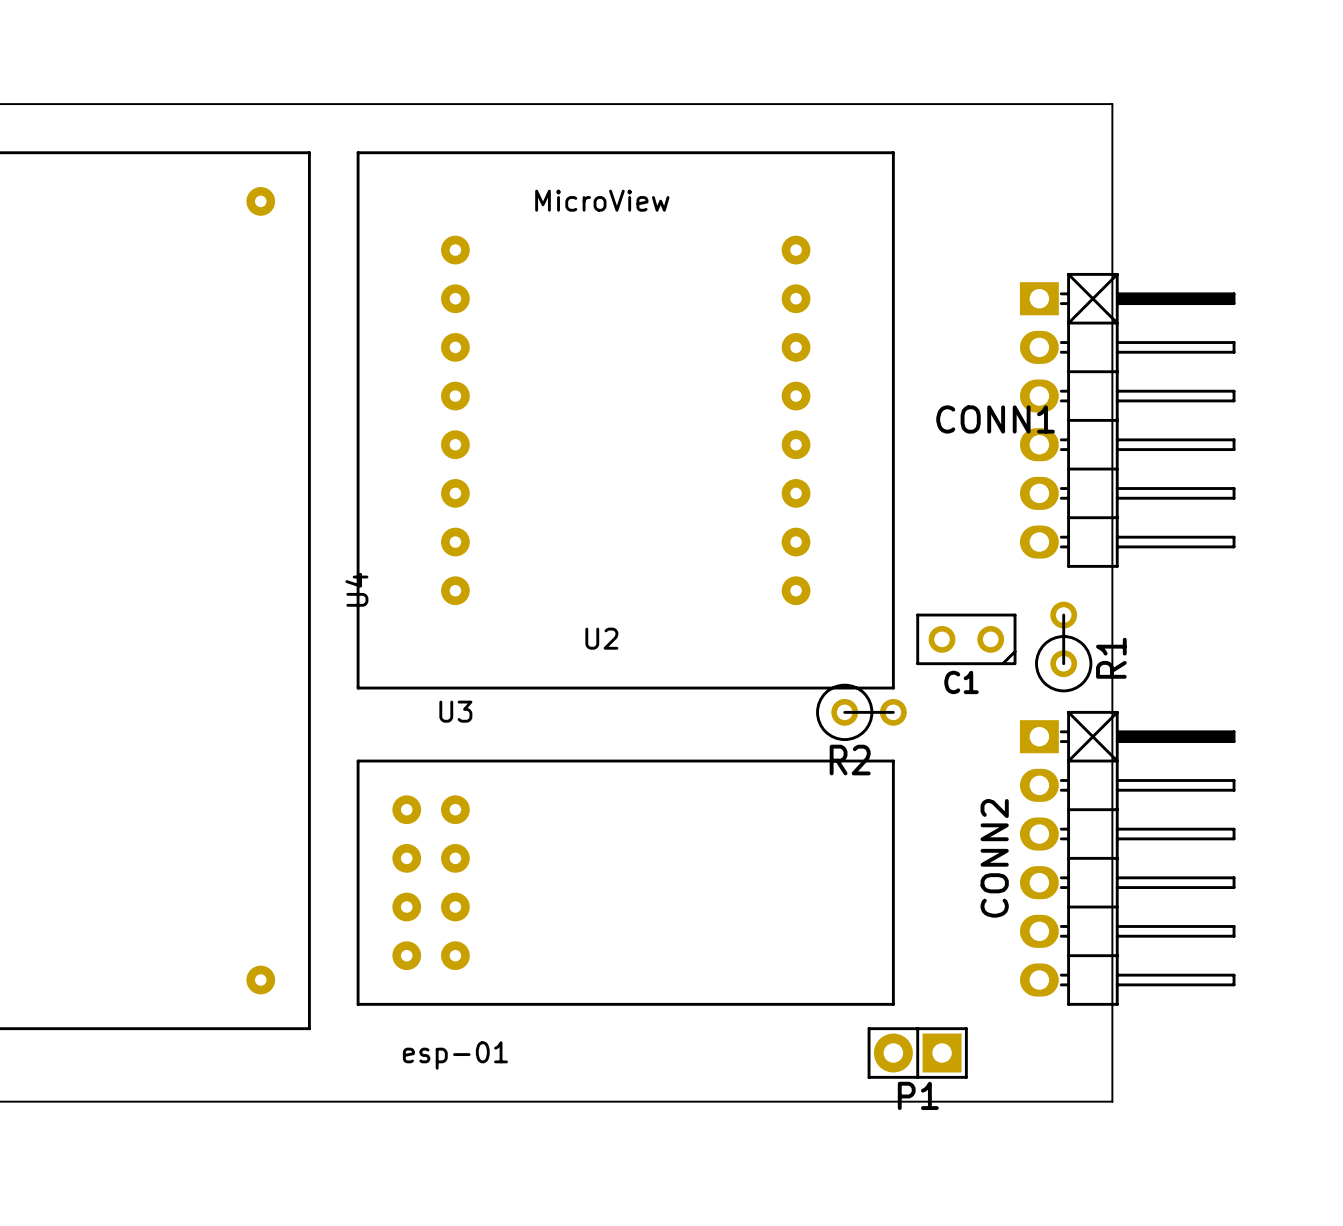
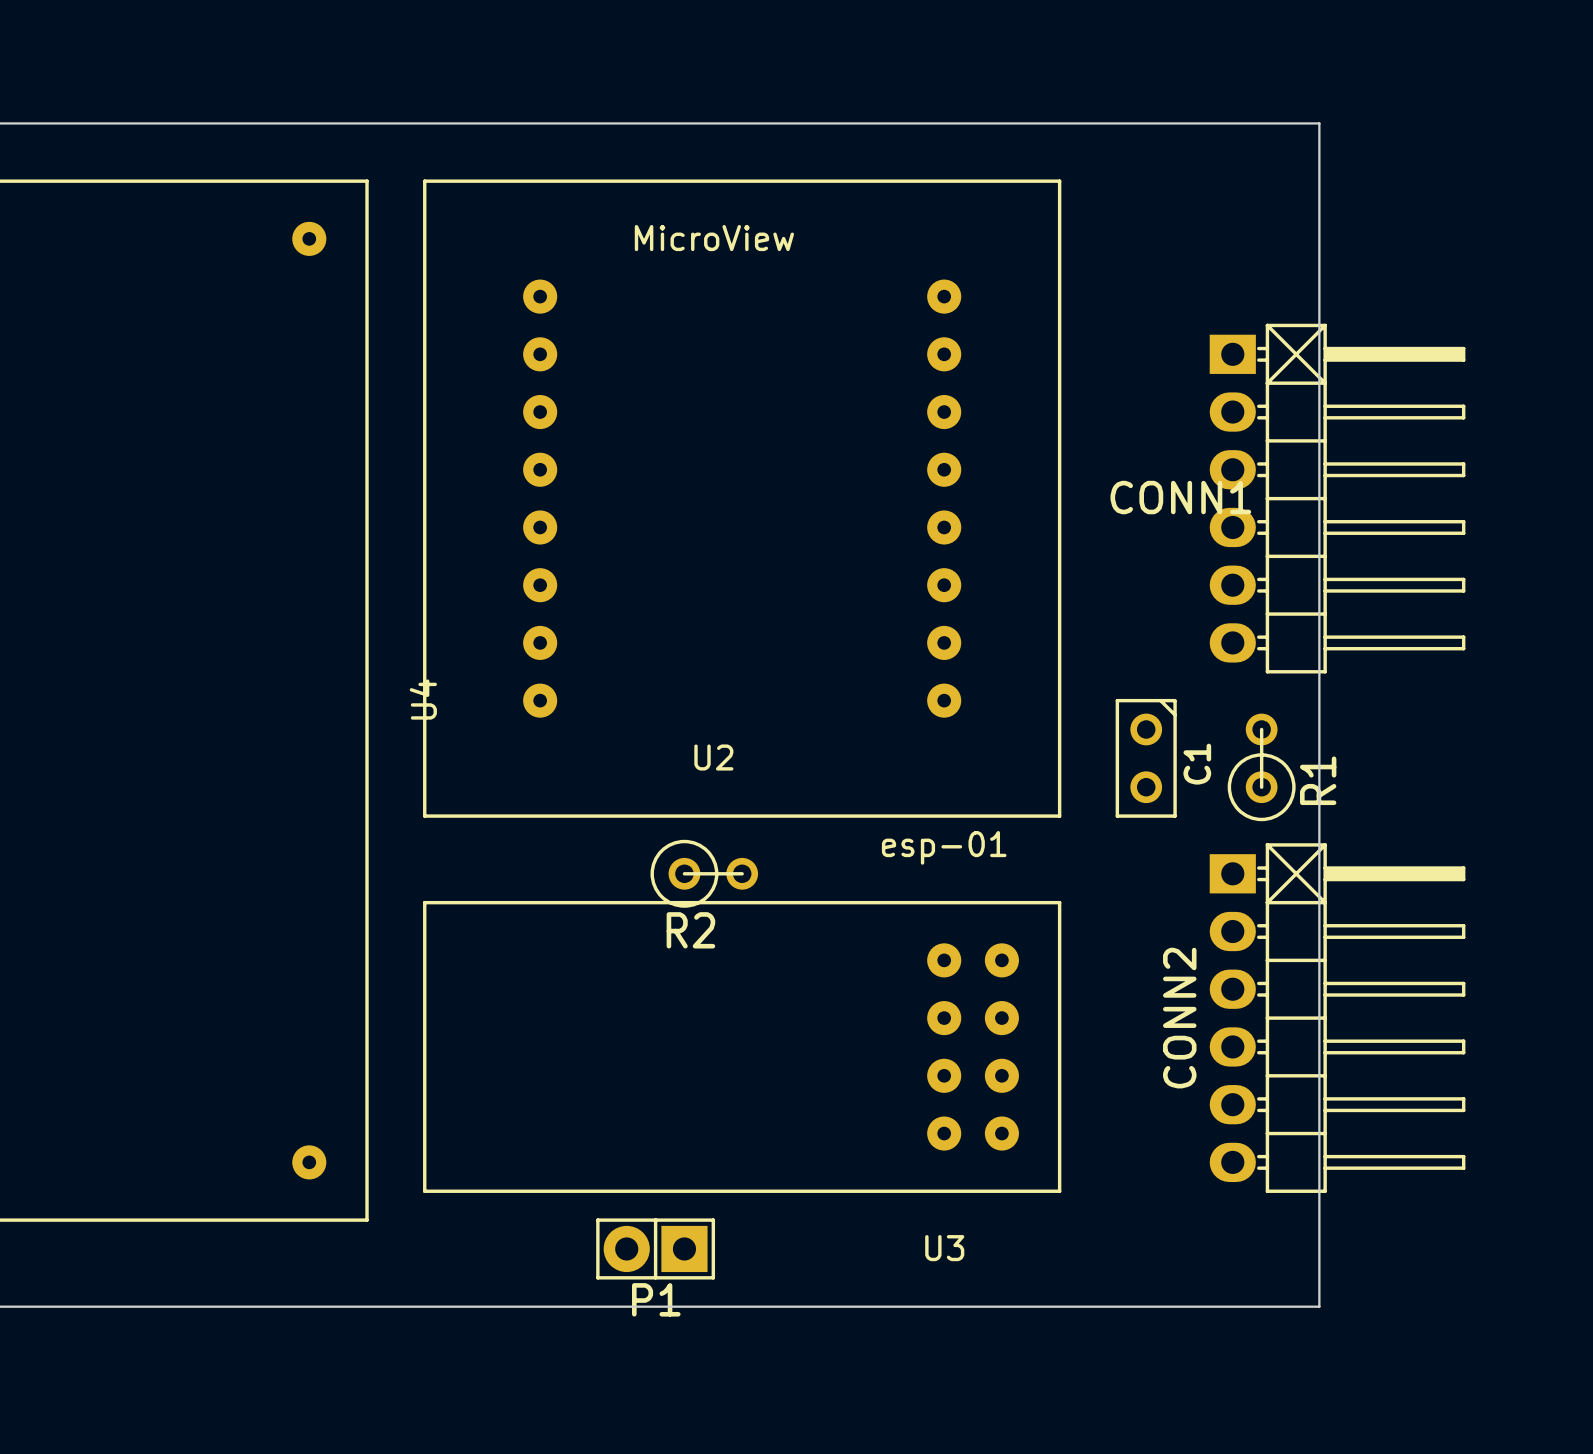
C1 rotation: 0° (966, 639) -> 90° counterclockwise (1146, 758)
R2 position: (861, 712) -> (704, 873)
U3 rotation: 0° (625, 882) -> 180° (742, 1046)
P1 position: (917, 1053) -> (655, 1248)

